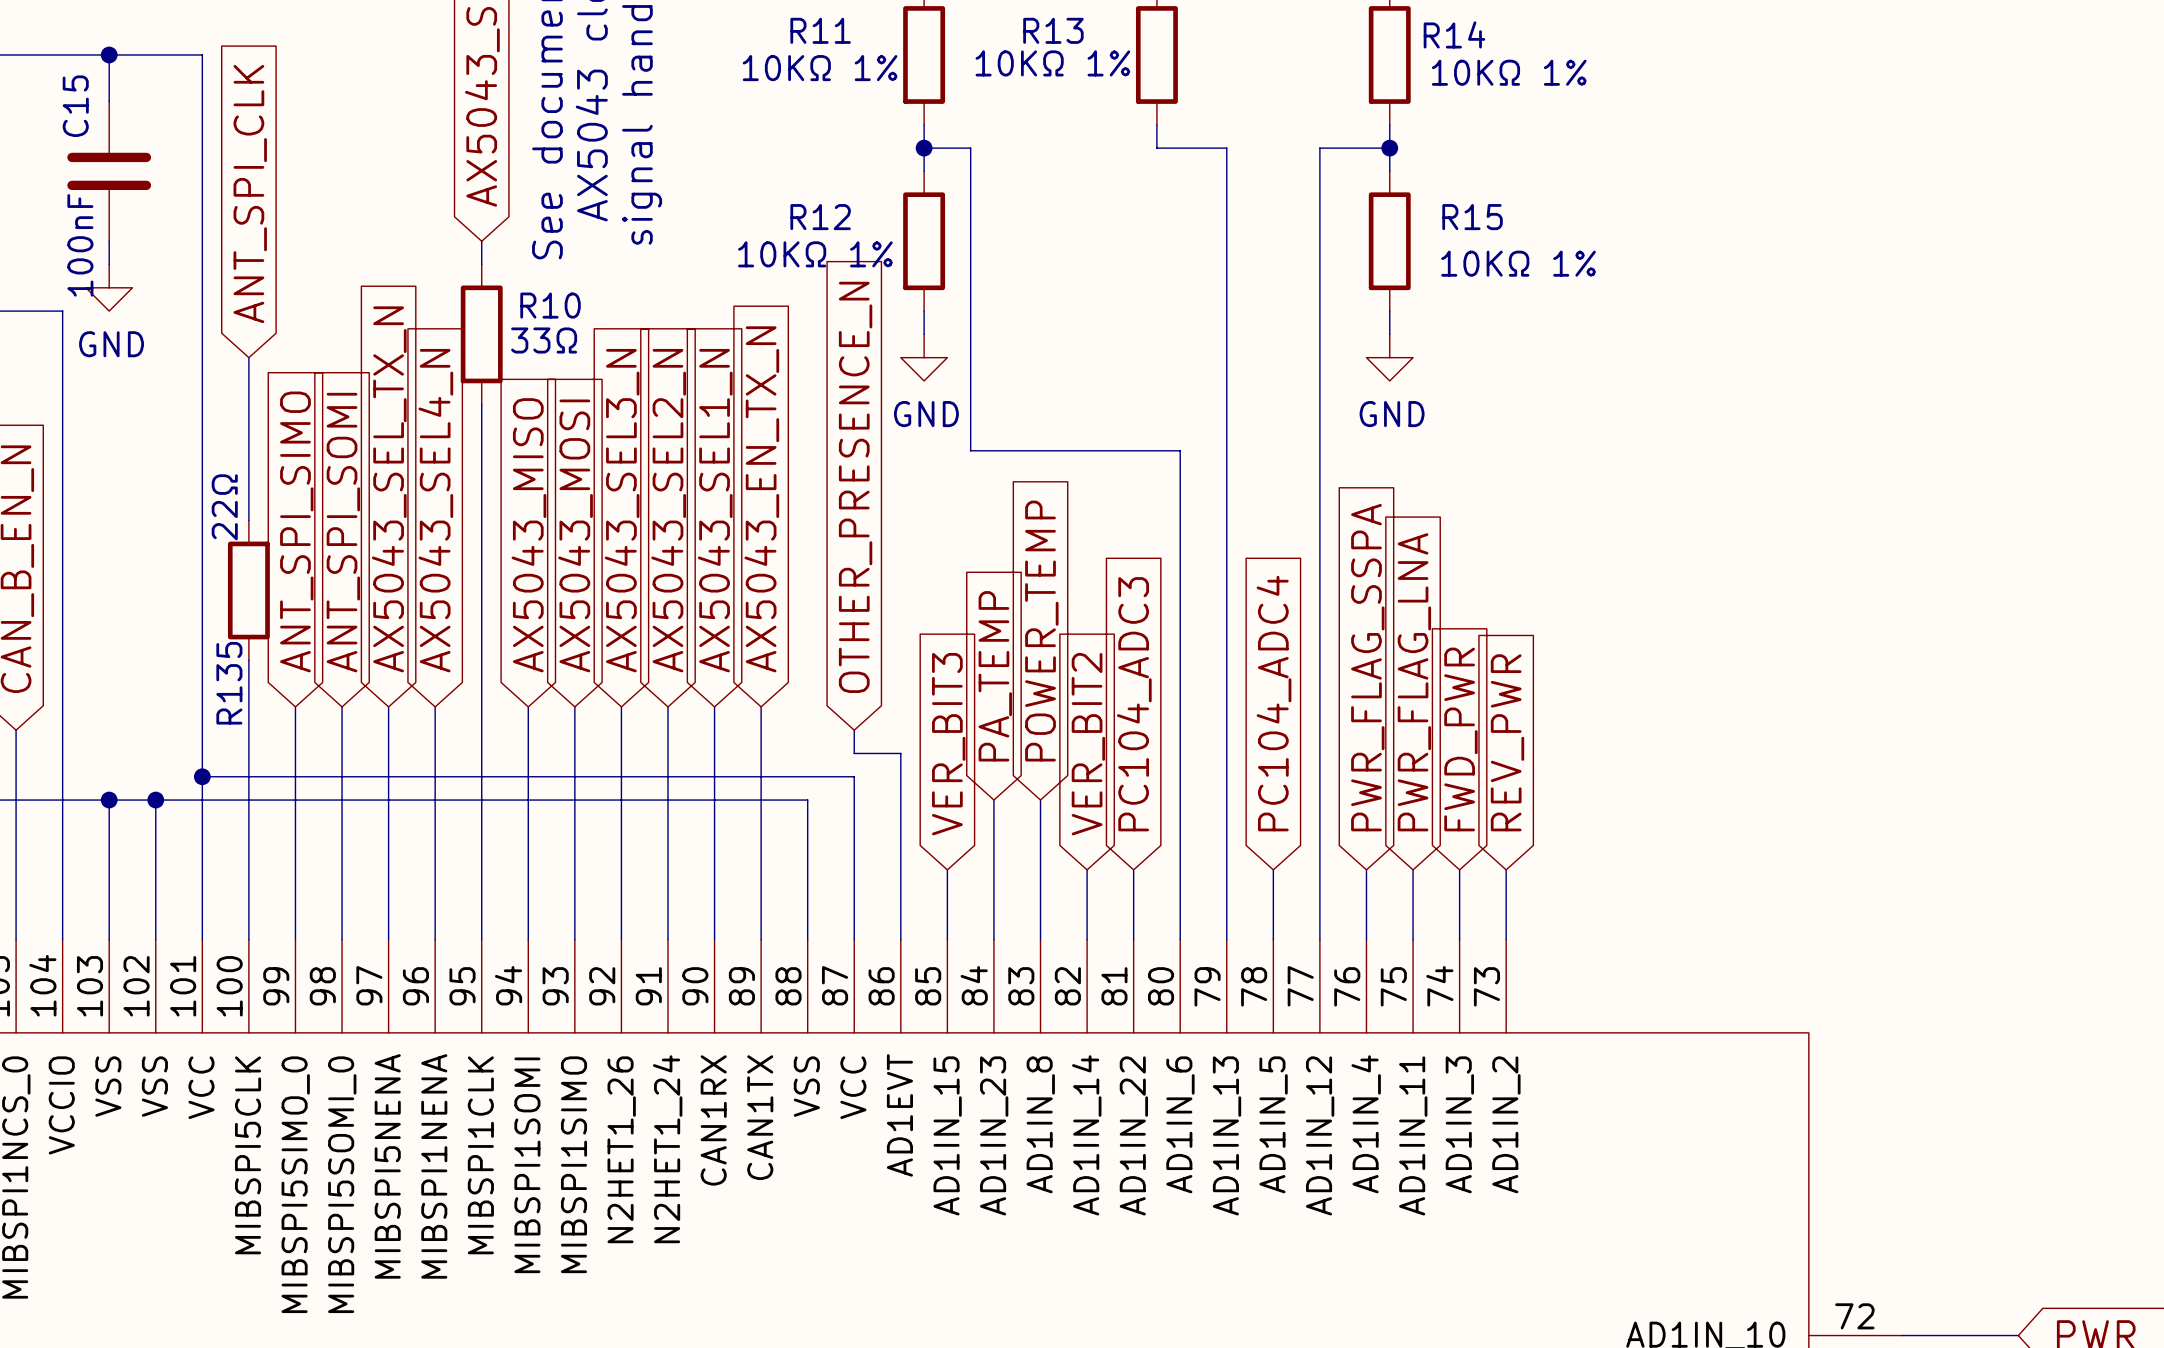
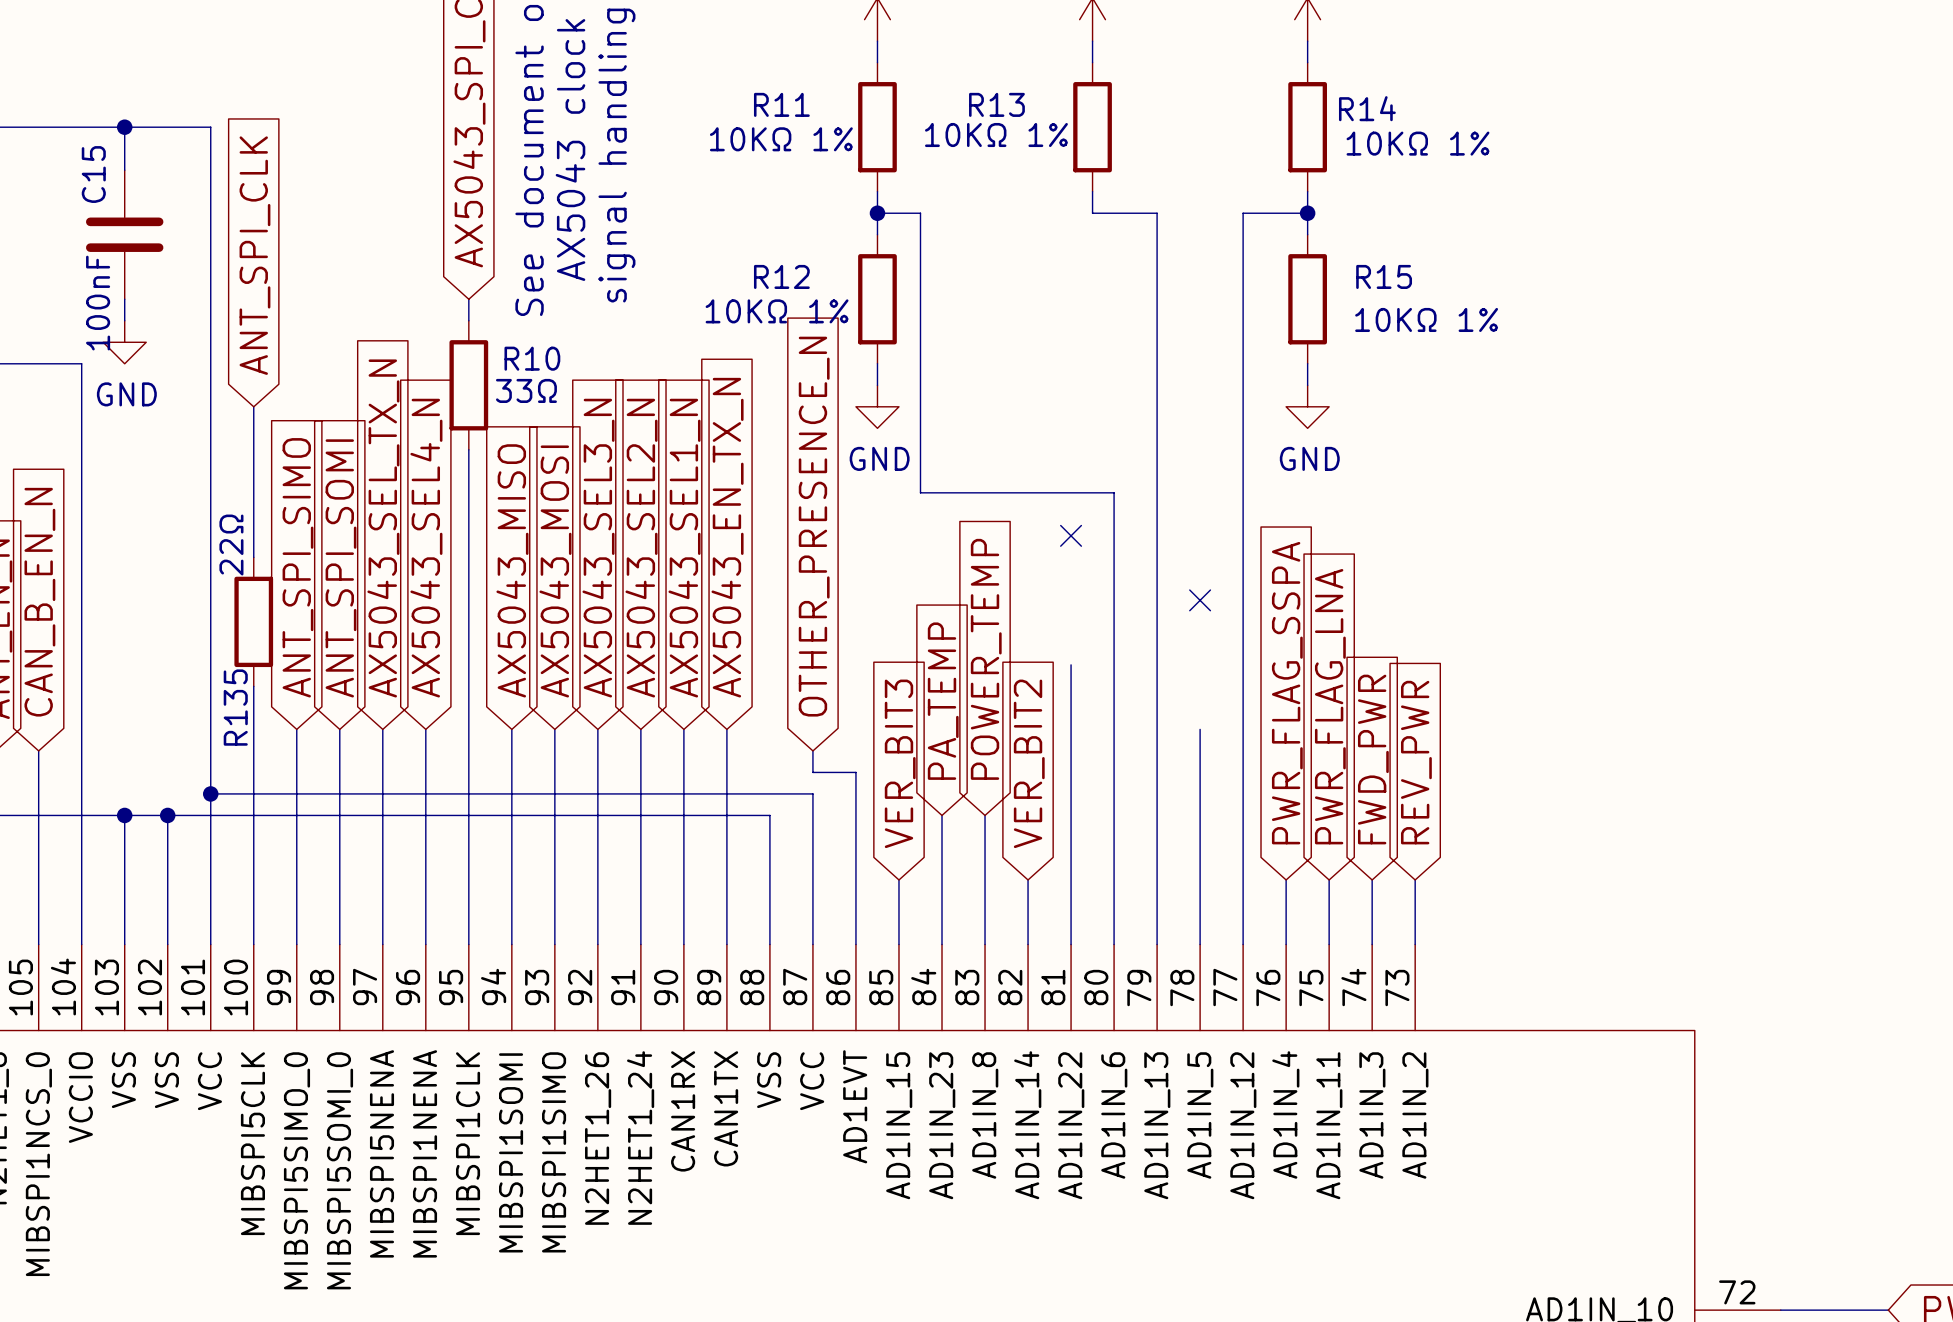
no-connect mark: none -> (1071, 535)
no-connect mark: none -> (1200, 600)
wire: none -> (1071, 664) (1071, 879)
global label: PC104_ADC4 (1274, 703) -> none
global label: PC104_ADC3 (1134, 704) -> none
wire: none -> (1200, 729) (1200, 879)

